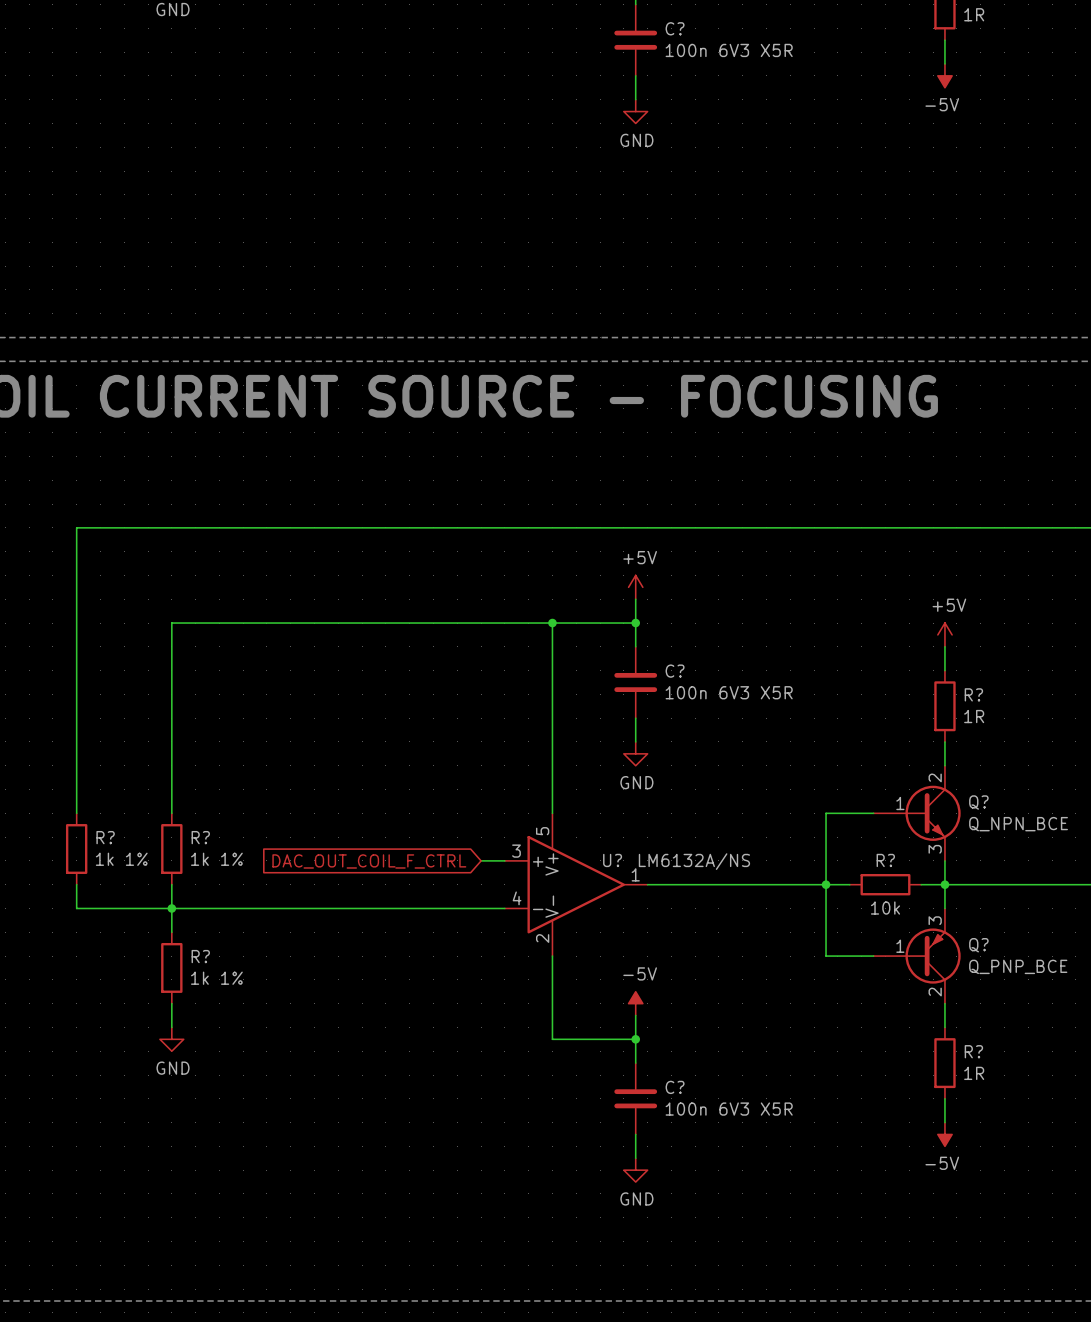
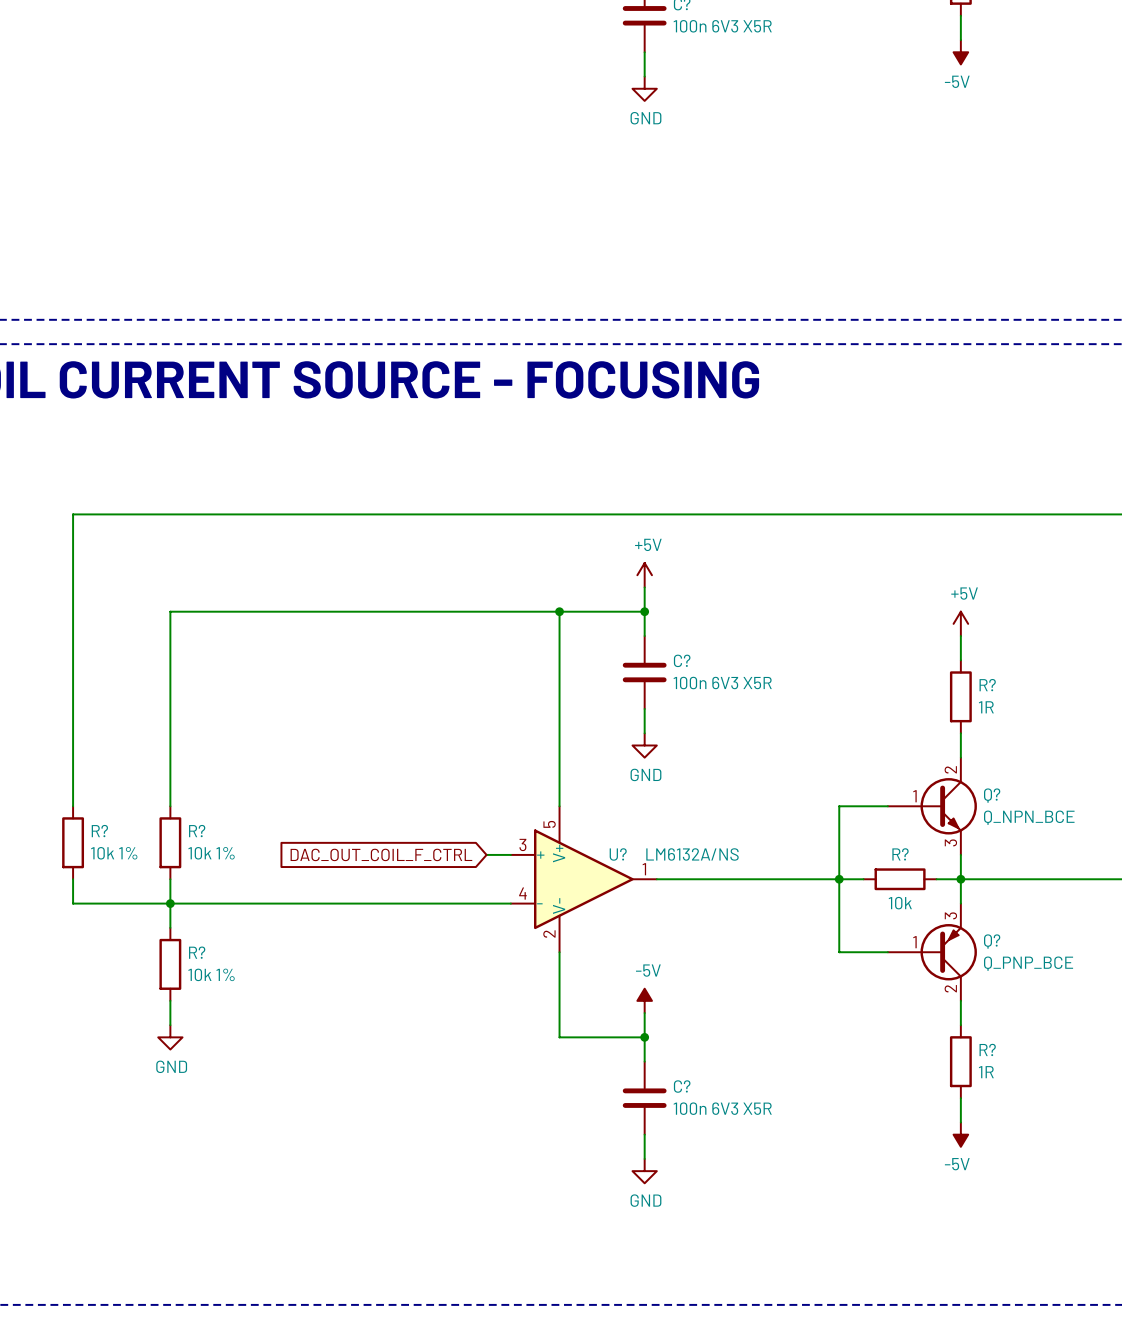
R? value: 1k 1% (121, 859) -> 10k 1% (114, 853)
R? value: 1k 1% (216, 859) -> 10k 1% (211, 853)
R? value: 1k 1% (216, 978) -> 10k 1% (211, 974)

